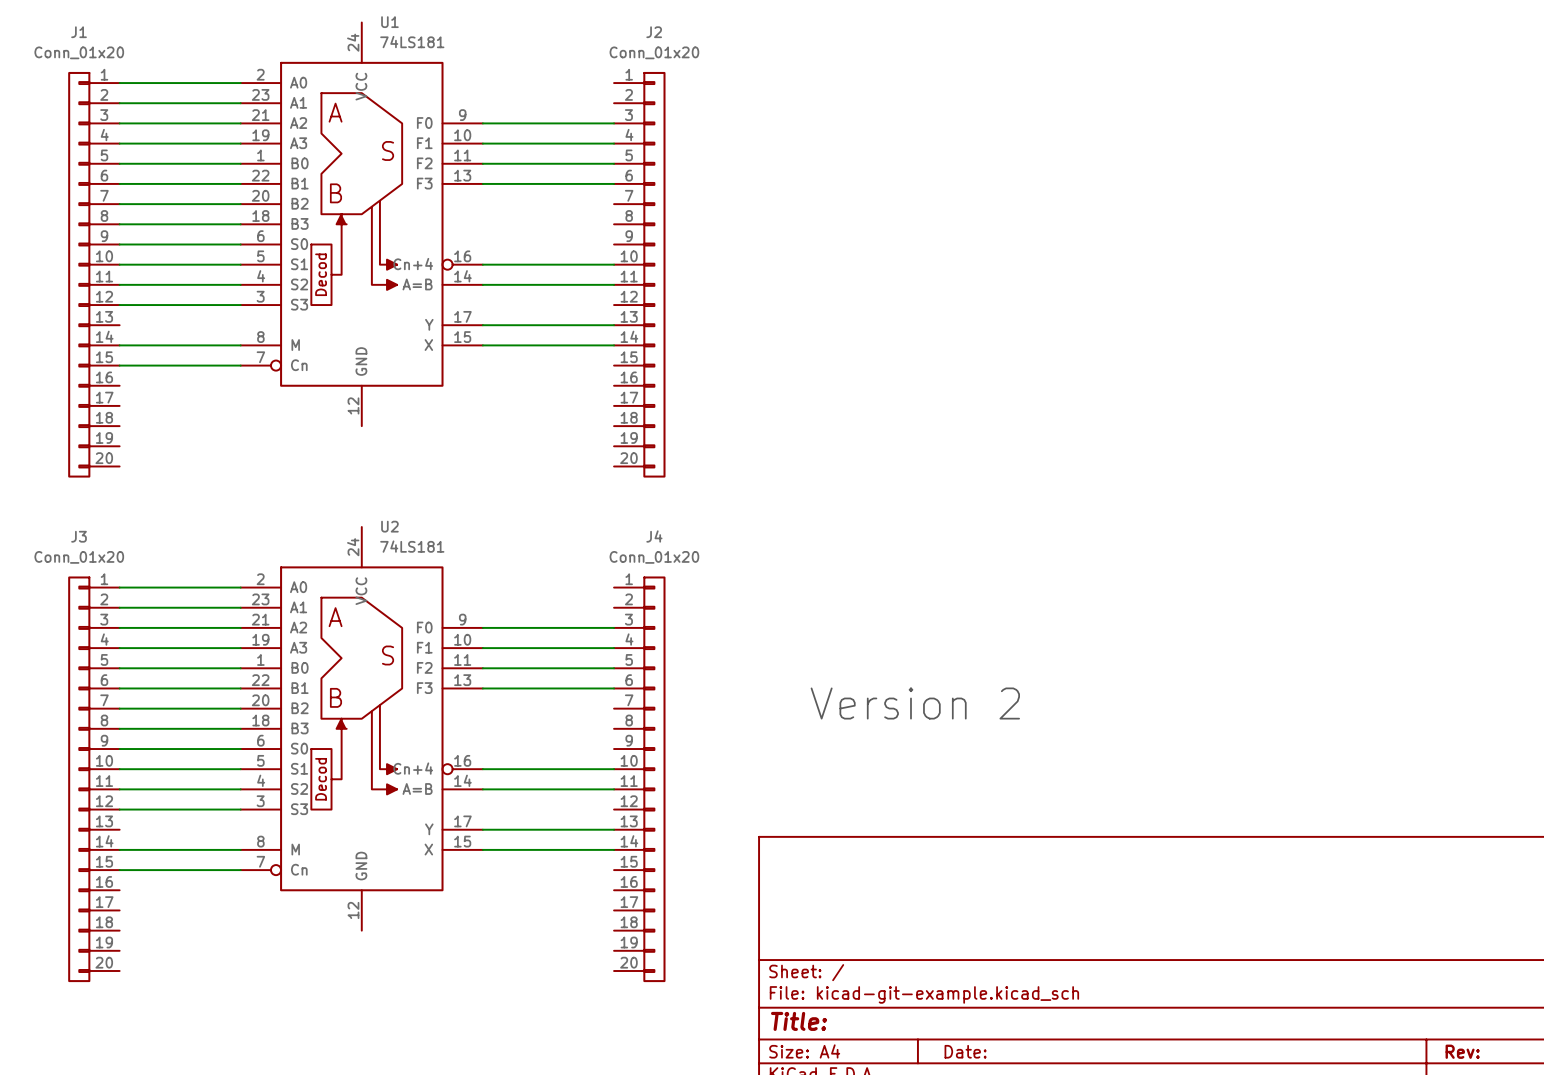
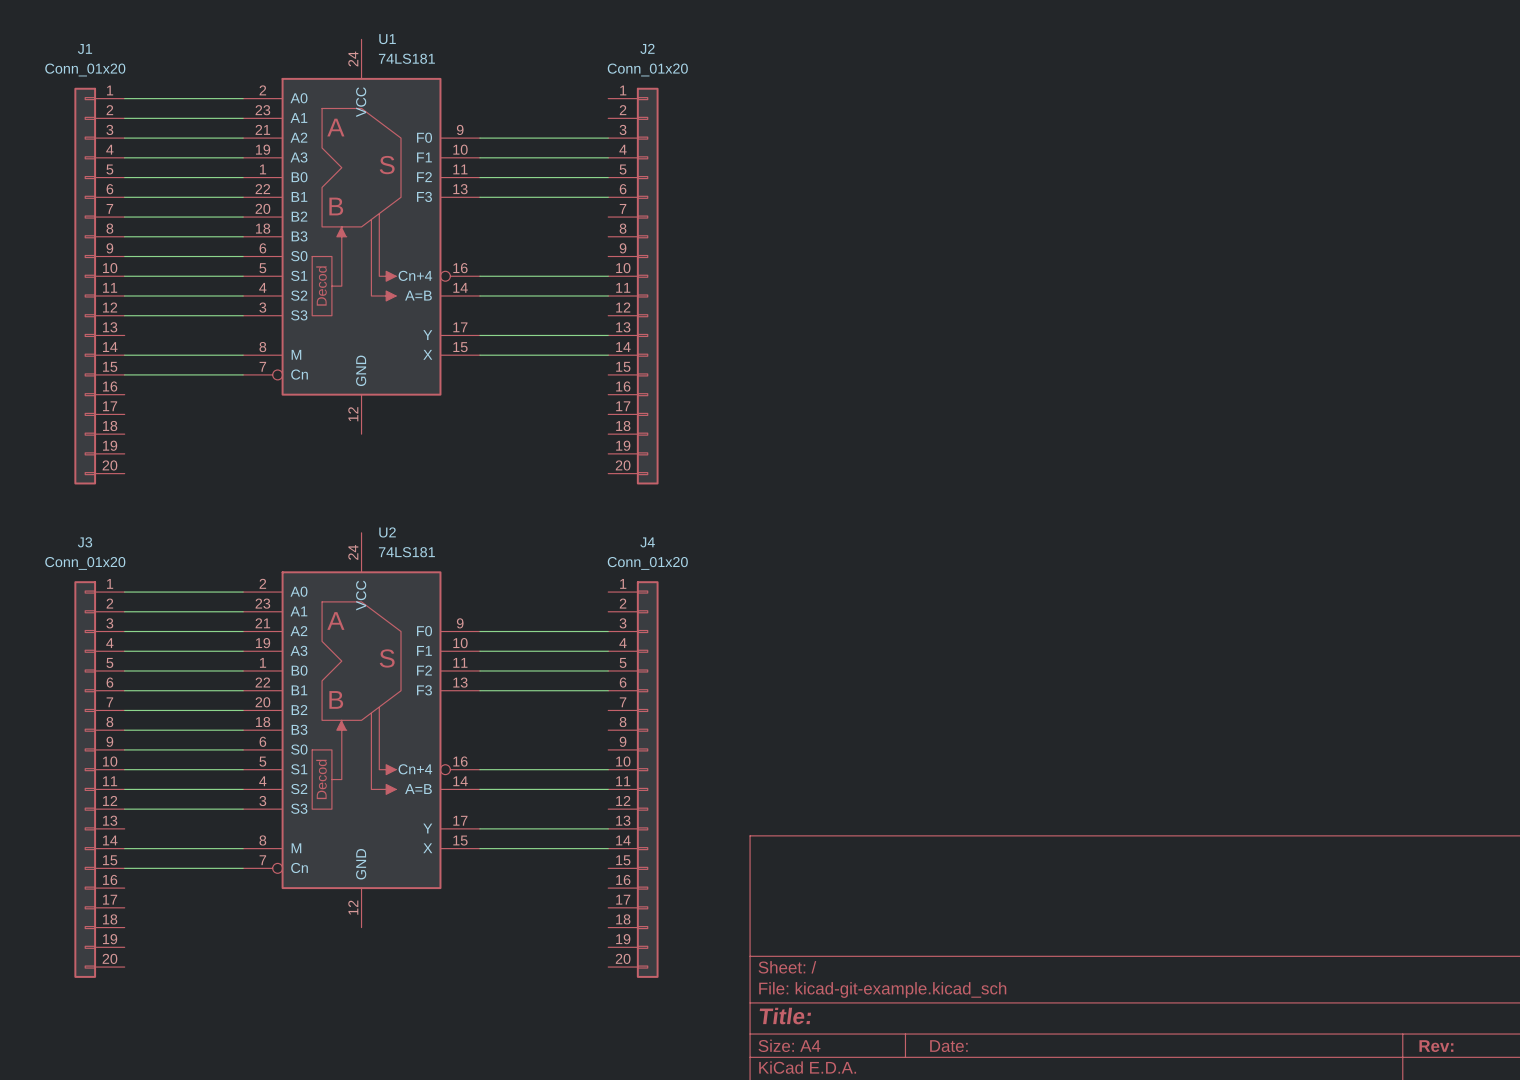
text: Version 2 (915, 703) -> none

